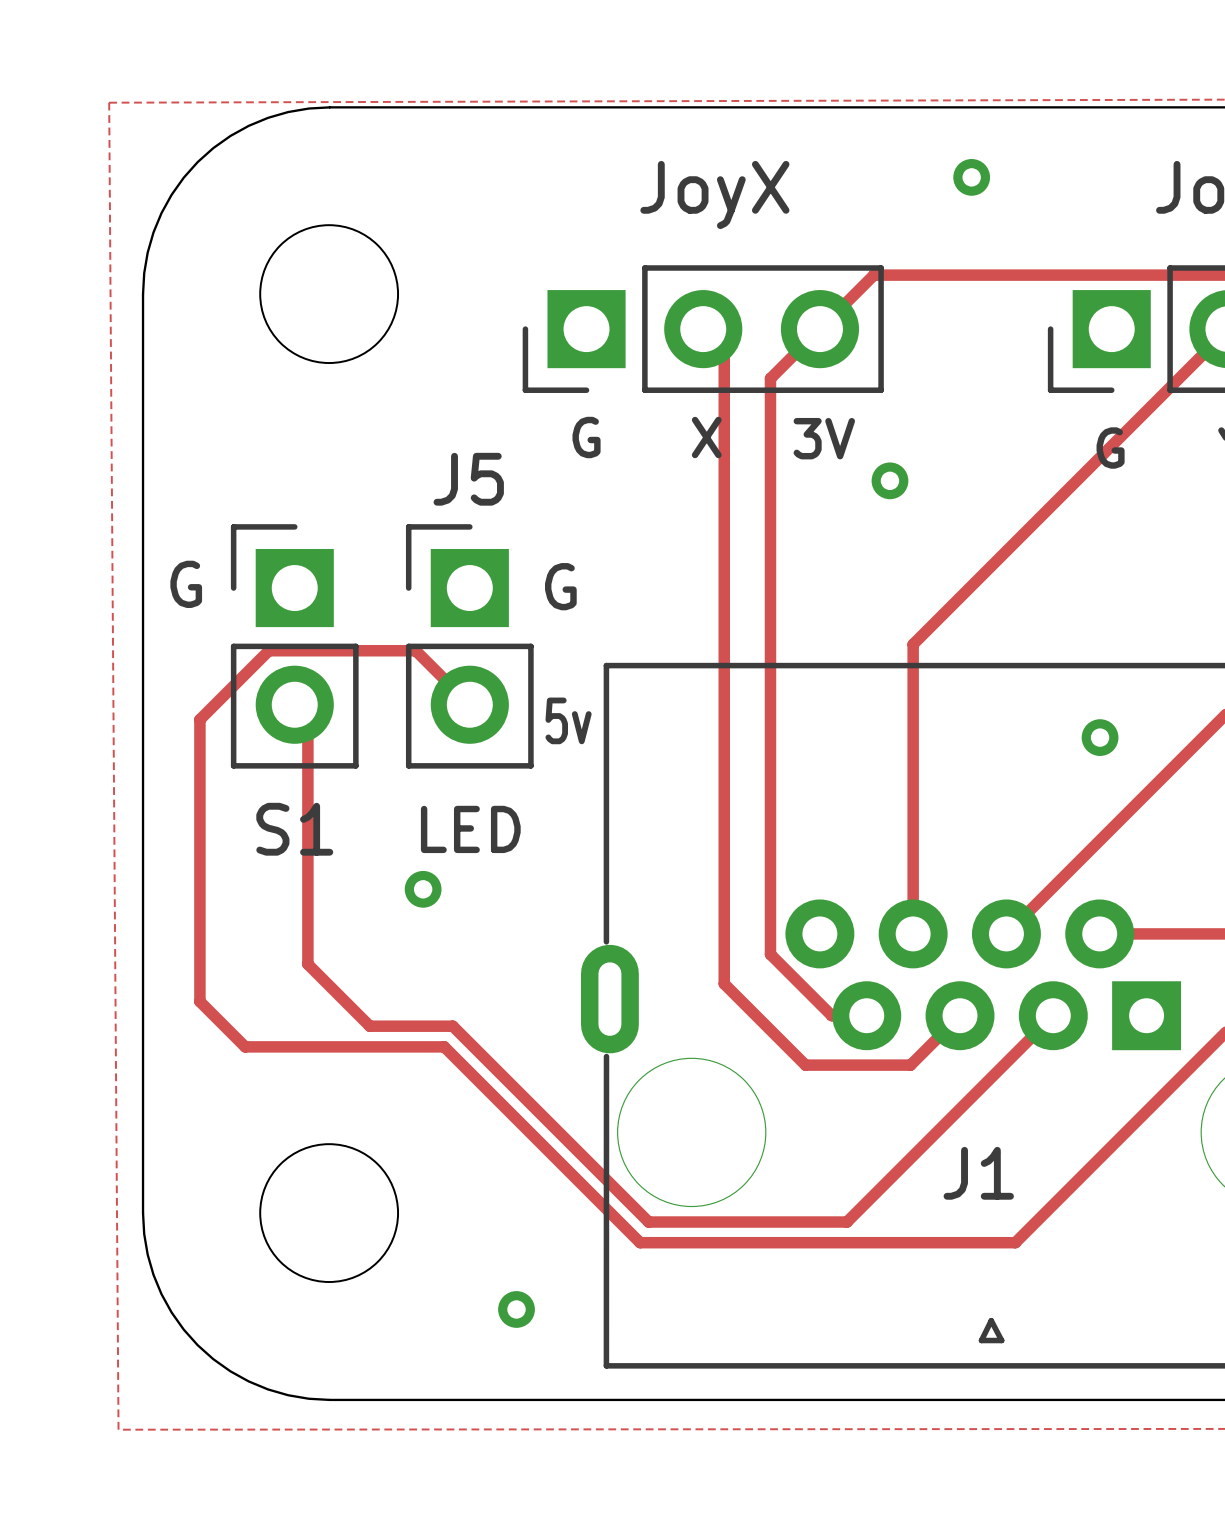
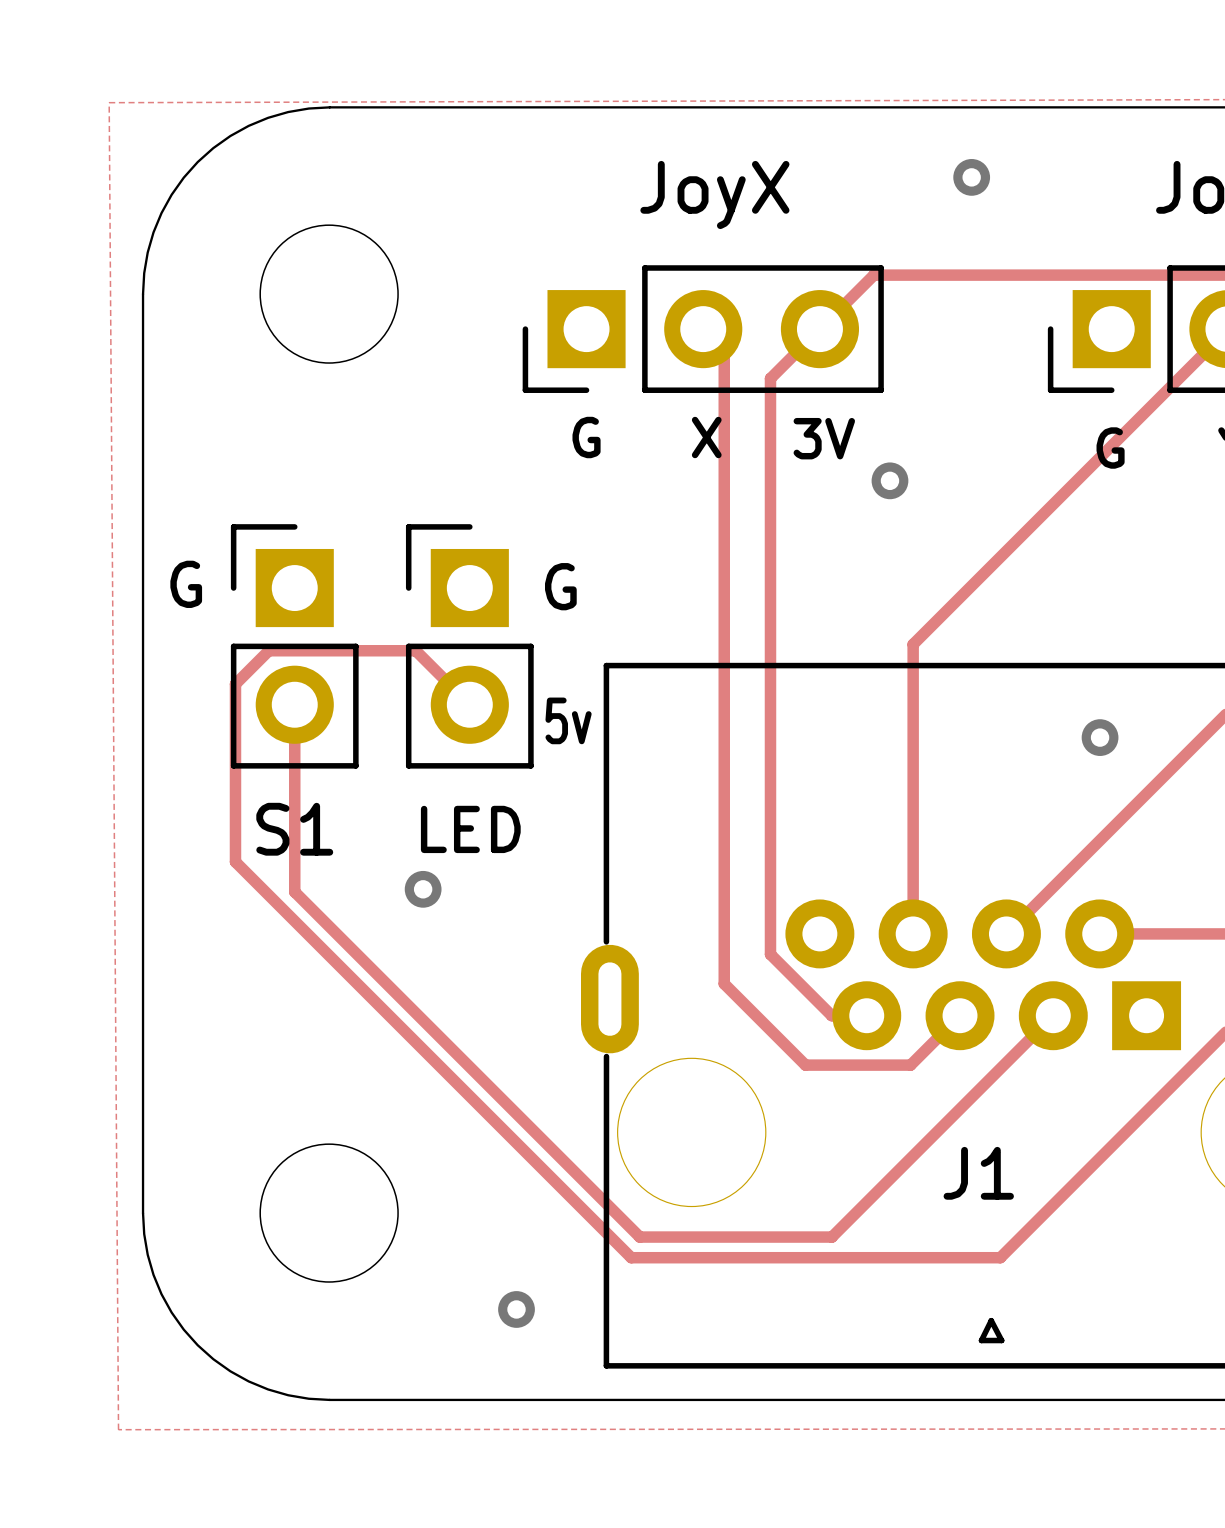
J5 name: J5 (468, 479) -> none
track: (235, 684) (199, 719) (199, 1001) (245, 1046) (444, 1046) (640, 1242) (1015, 1242) -> (235, 684) (235, 861) (631, 1257) (1000, 1257) (1015, 1242)
track: (294, 704) (307, 717) (307, 964) (369, 1026) (452, 1026) (648, 1222) (846, 1222) -> (294, 704) (294, 891) (639, 1237) (831, 1237) (846, 1222)

